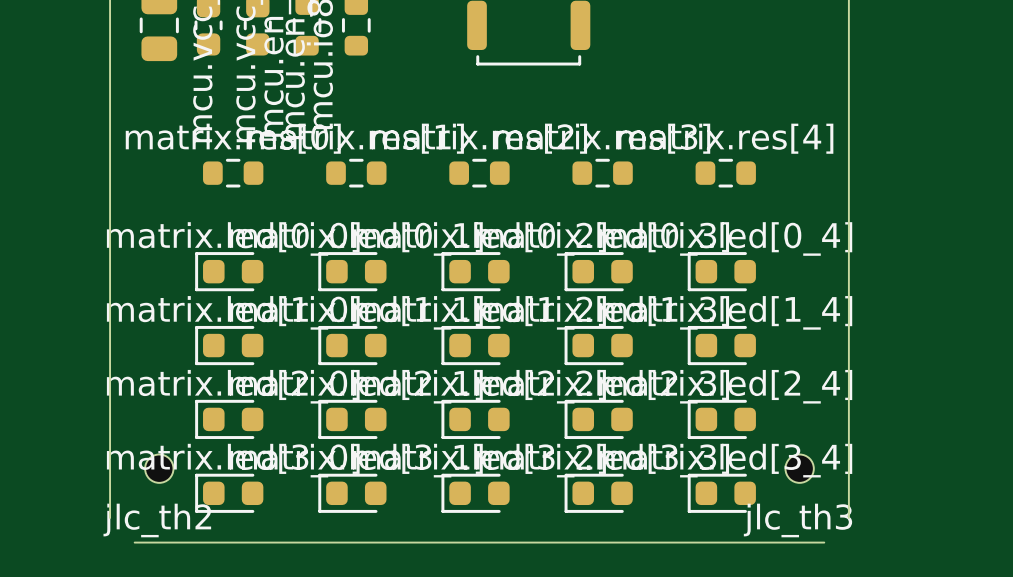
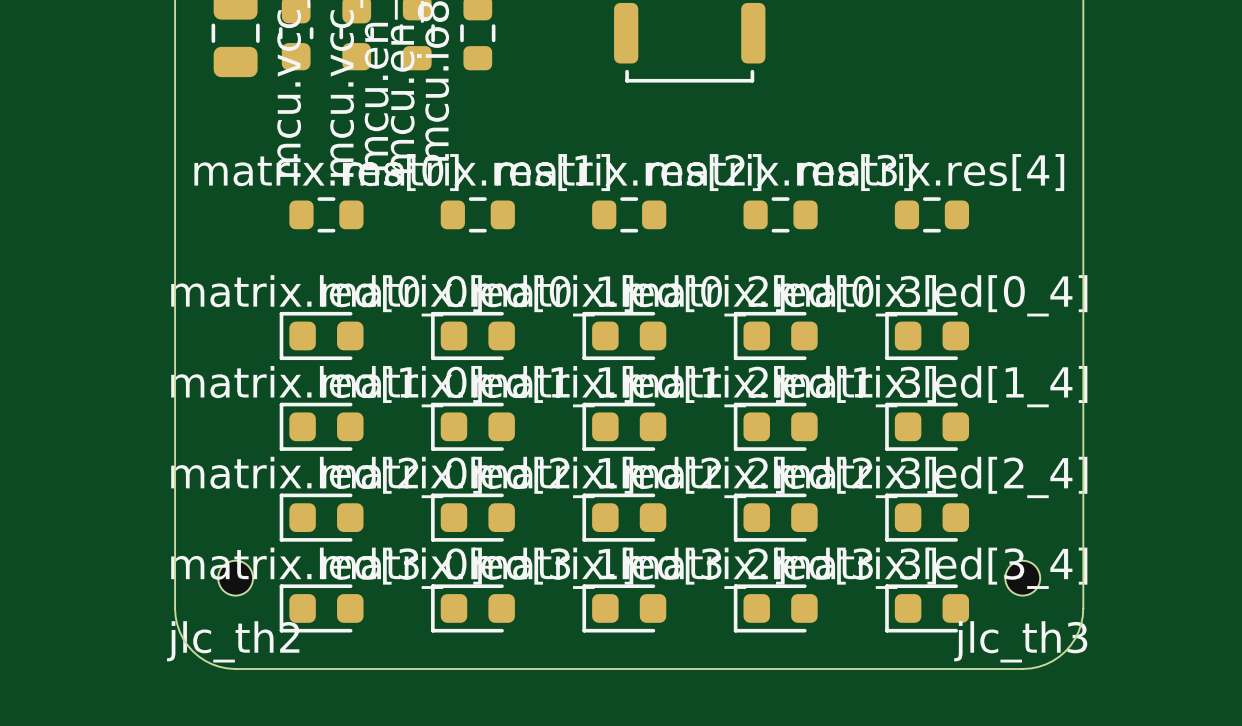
board edge: (110, 493) (110, 517) -> (175, 608) (179, 631) (192, 651) (212, 664) (235, 669)
board edge: (848, 493) (848, 517) -> (1083, 608) (1078, 631) (1065, 651) (1045, 664) (1022, 669)
board edge: (134, 542) (159, 542) -> none
board edge: (799, 542) (824, 542) -> none

